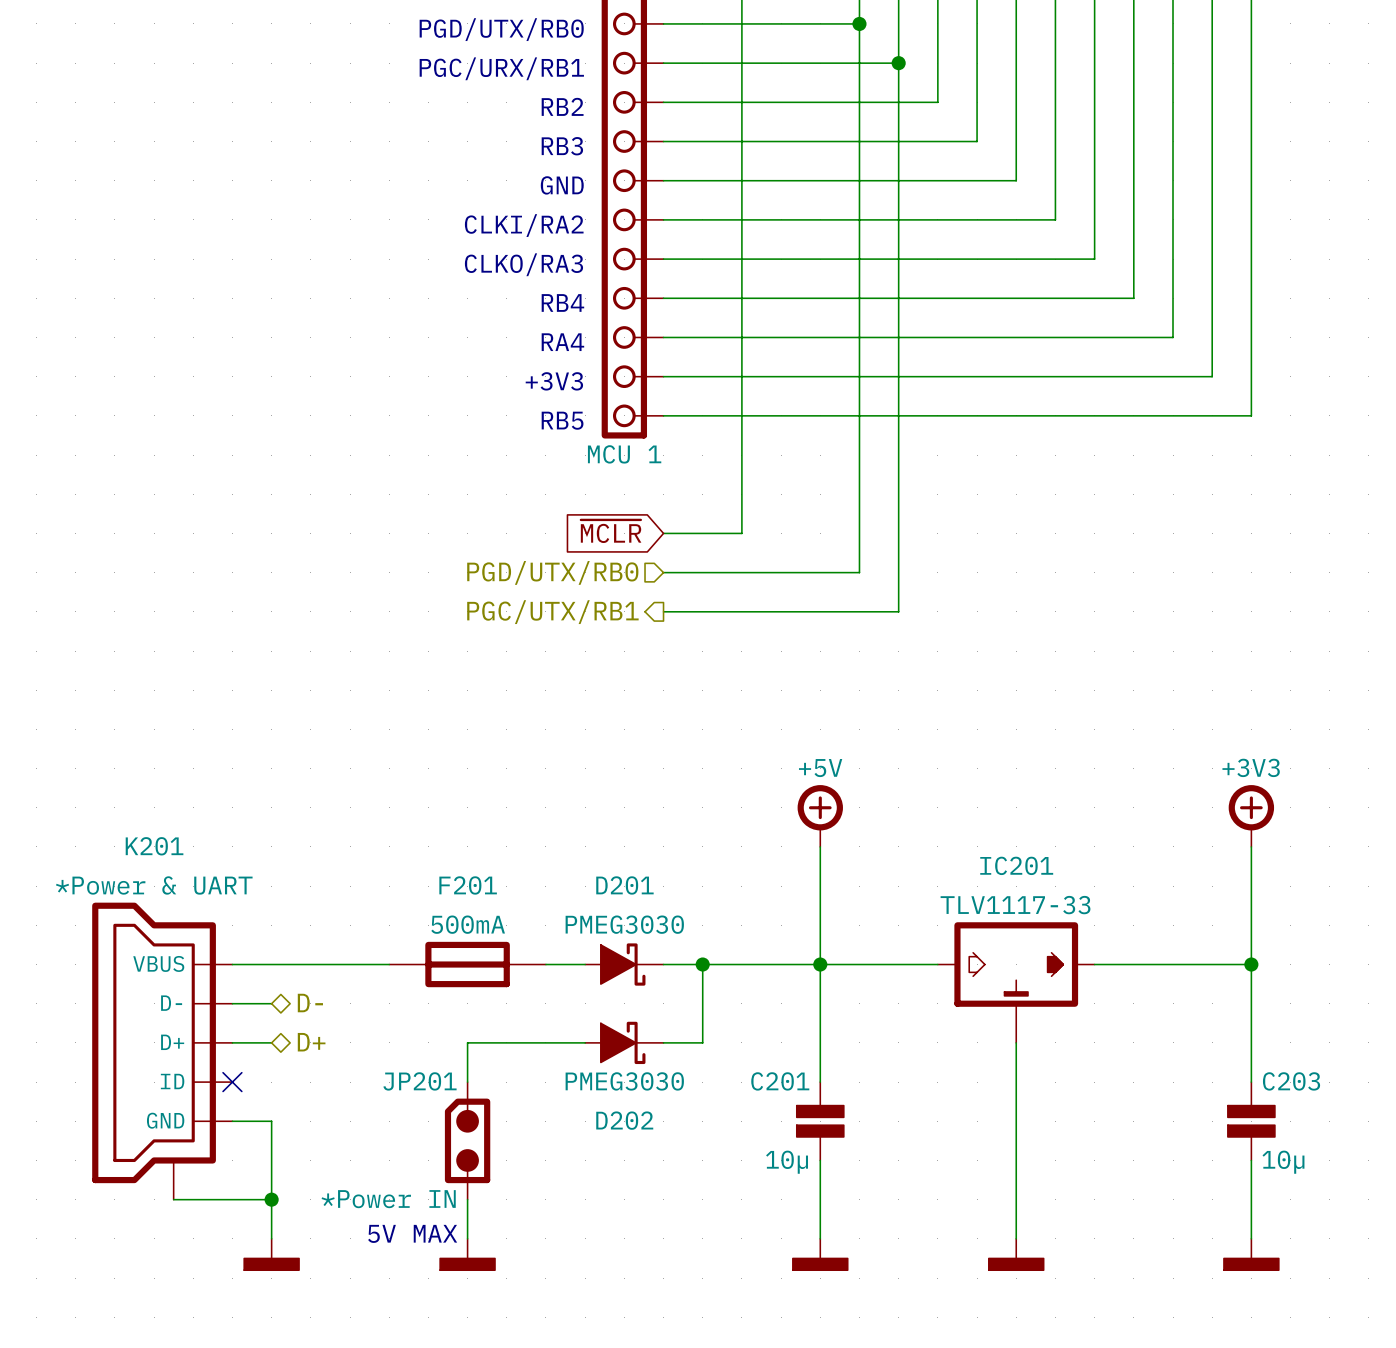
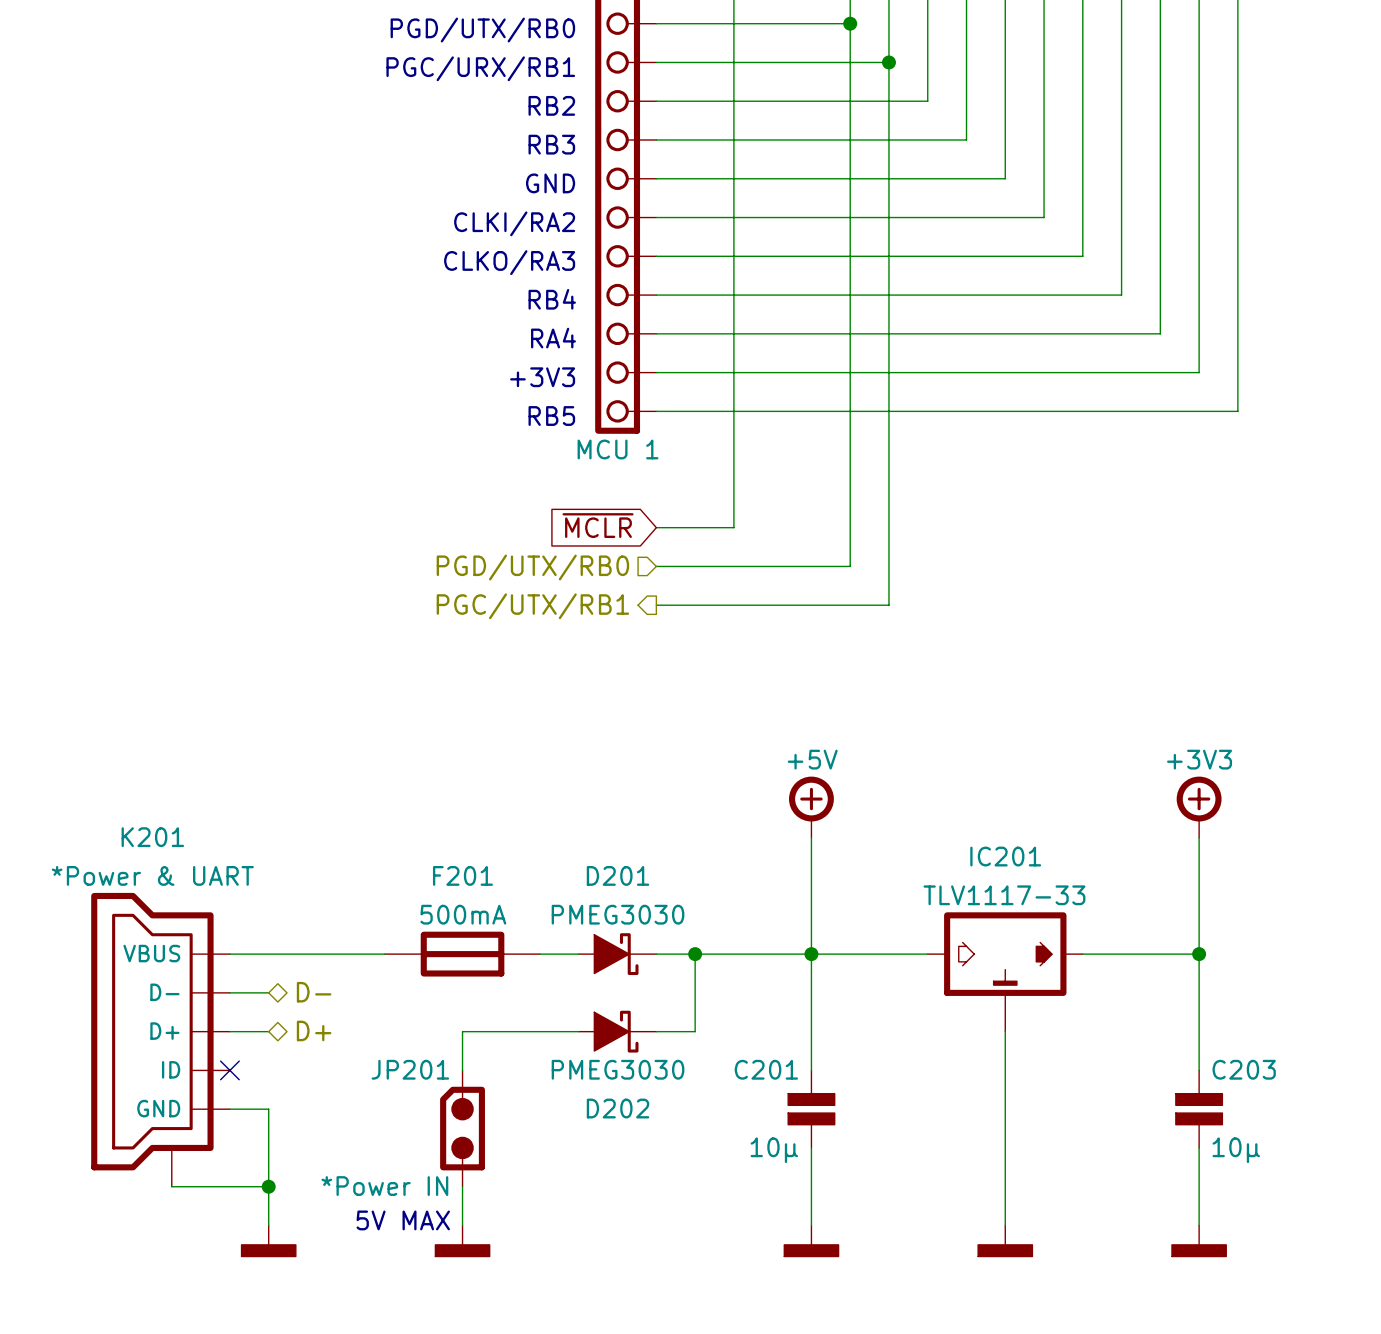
power symbol position: (1251, 816) -> (1199, 807)
wire: (1251, 846) (1251, 1082) -> (1199, 837) (1199, 1070)
wire: (1212, 964) (1251, 964) -> none
junction position: (1251, 964) -> (1199, 954)
C203 position: (1251, 1121) -> (1199, 1109)
wire: (1251, 1160) (1251, 1238) -> (1199, 1147) (1199, 1225)
power symbol position: (1251, 1254) -> (1199, 1241)

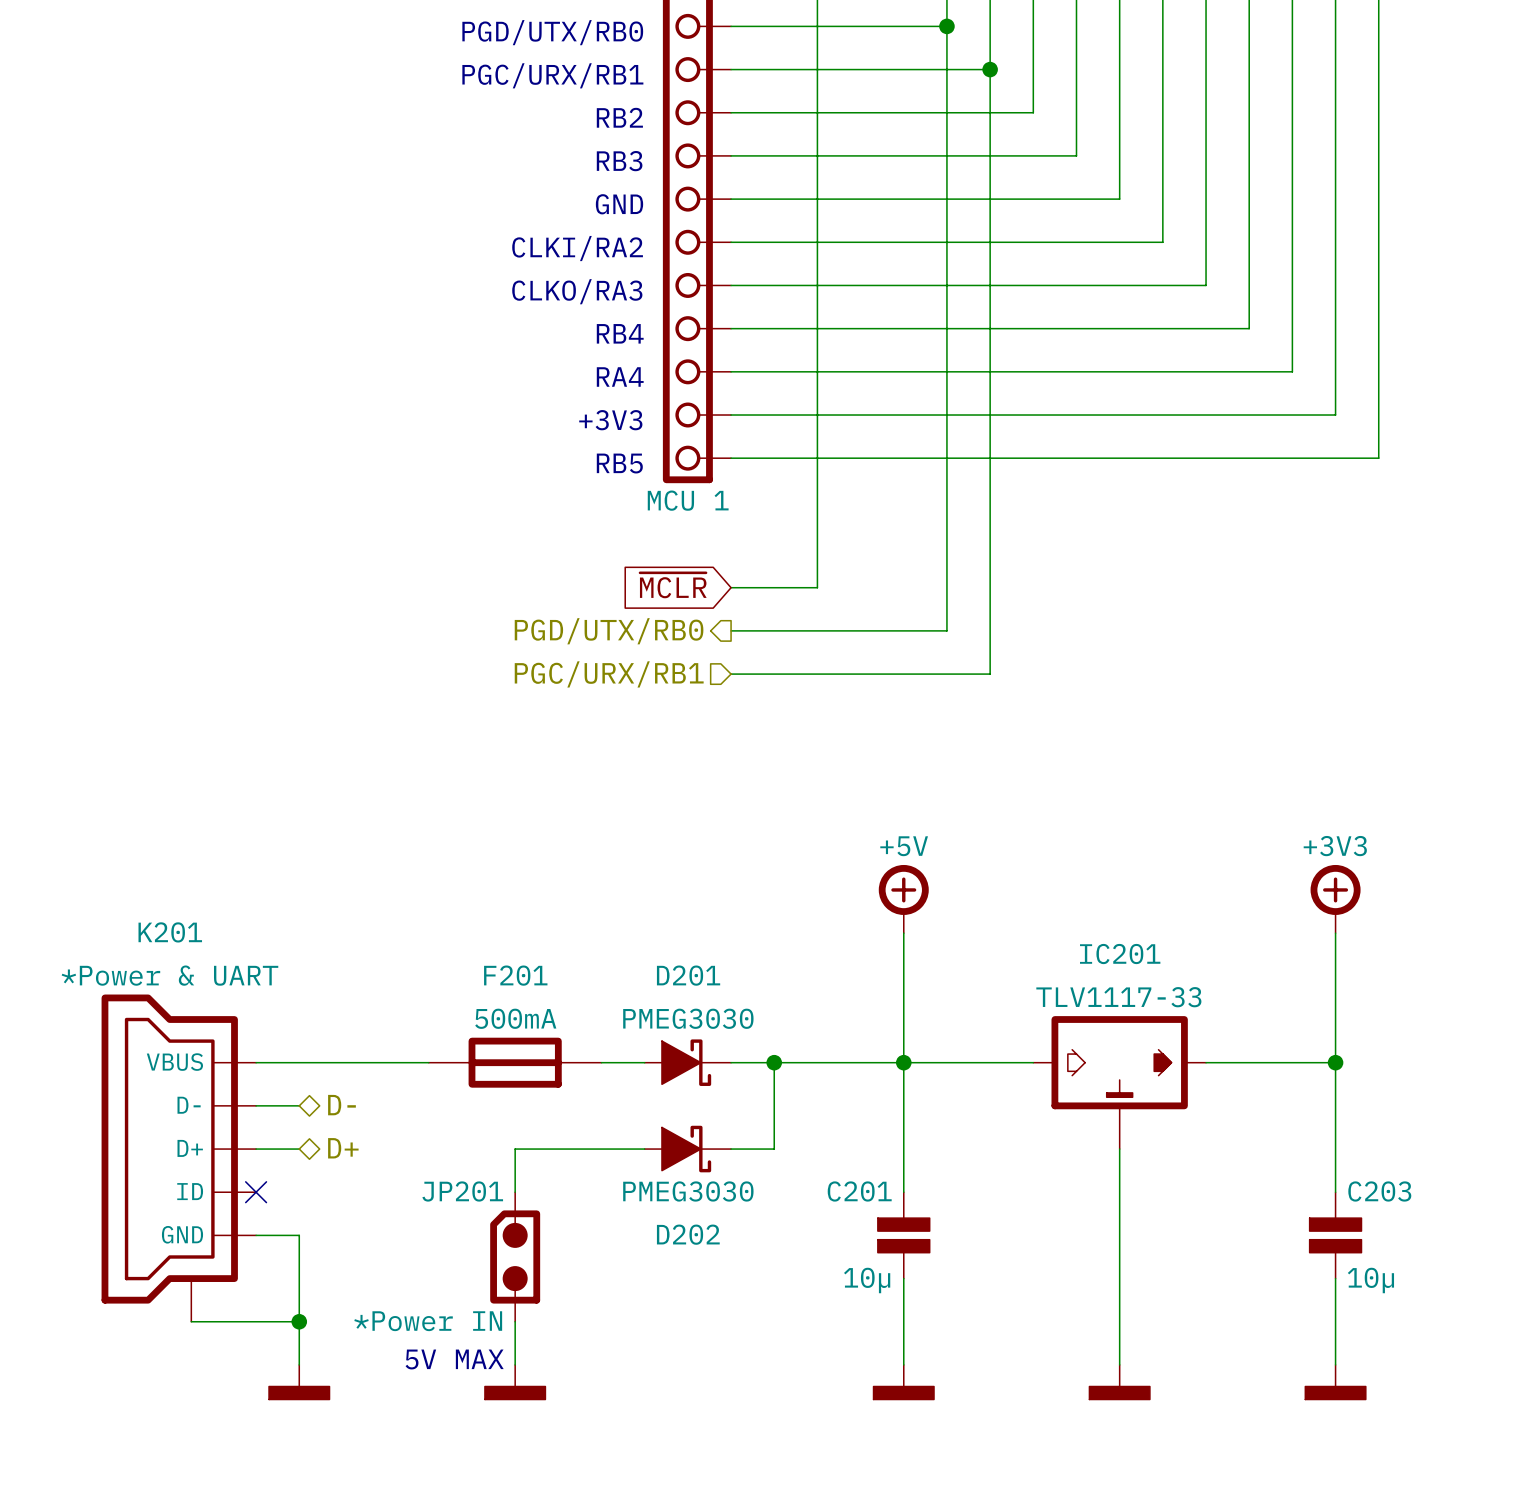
hierarchical label shape: input (532, 567) -> output (609, 631)
hierarchical label shape: output (532, 606) -> input (609, 674)
hierarchical label: PGC/UTX/RB1 (532, 606) -> PGC/URX/RB1 (609, 674)

